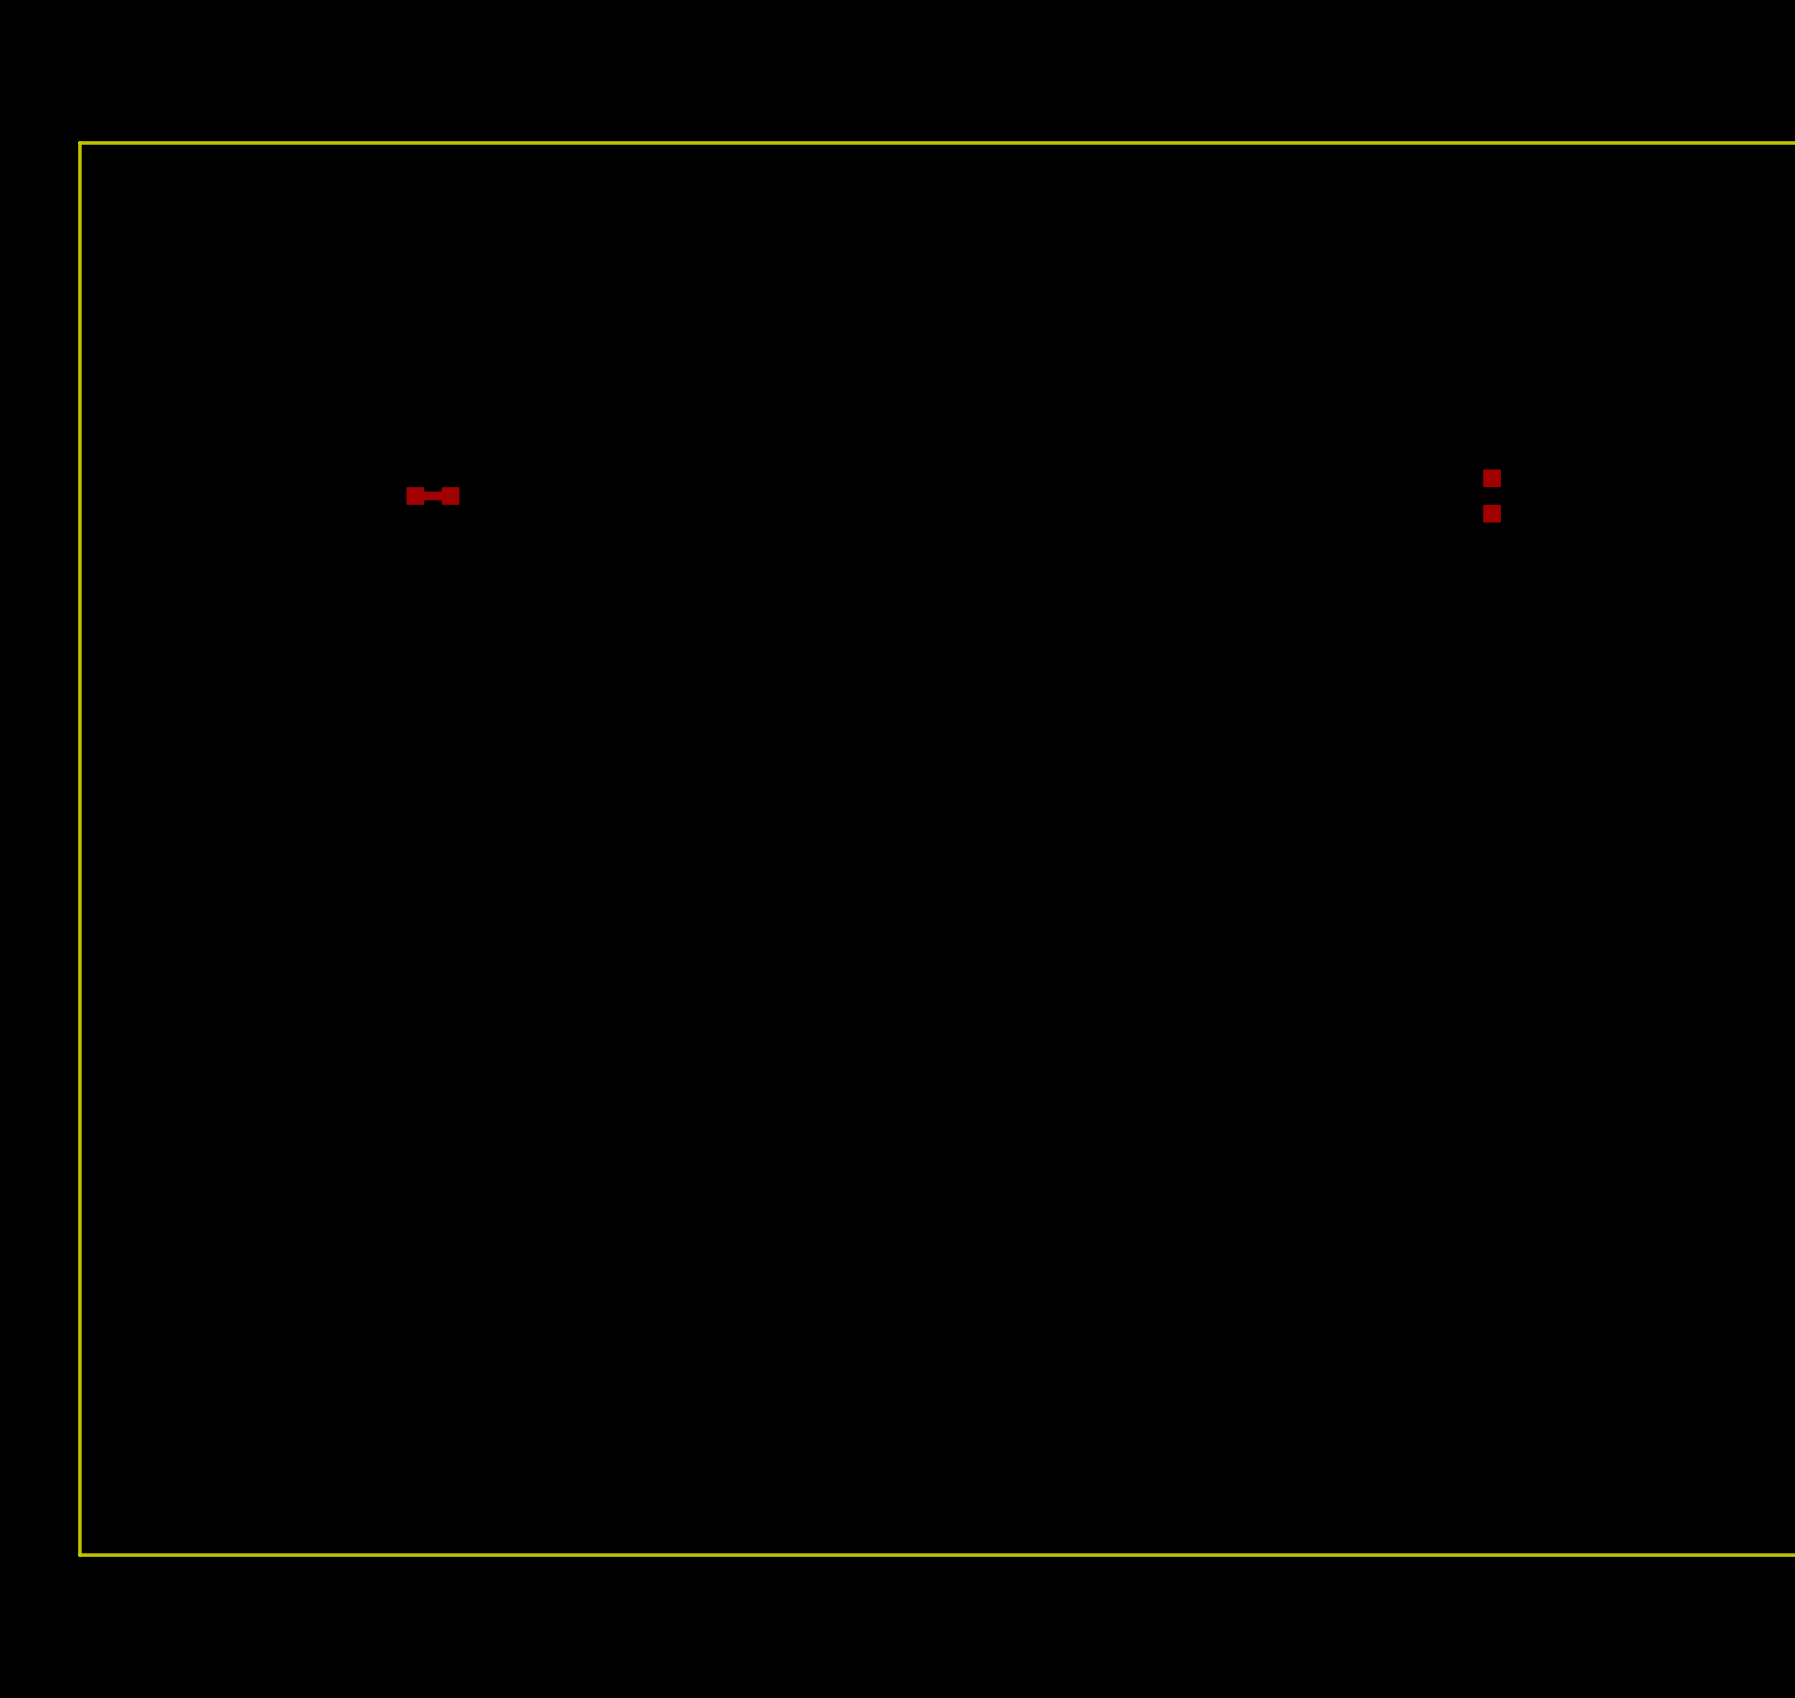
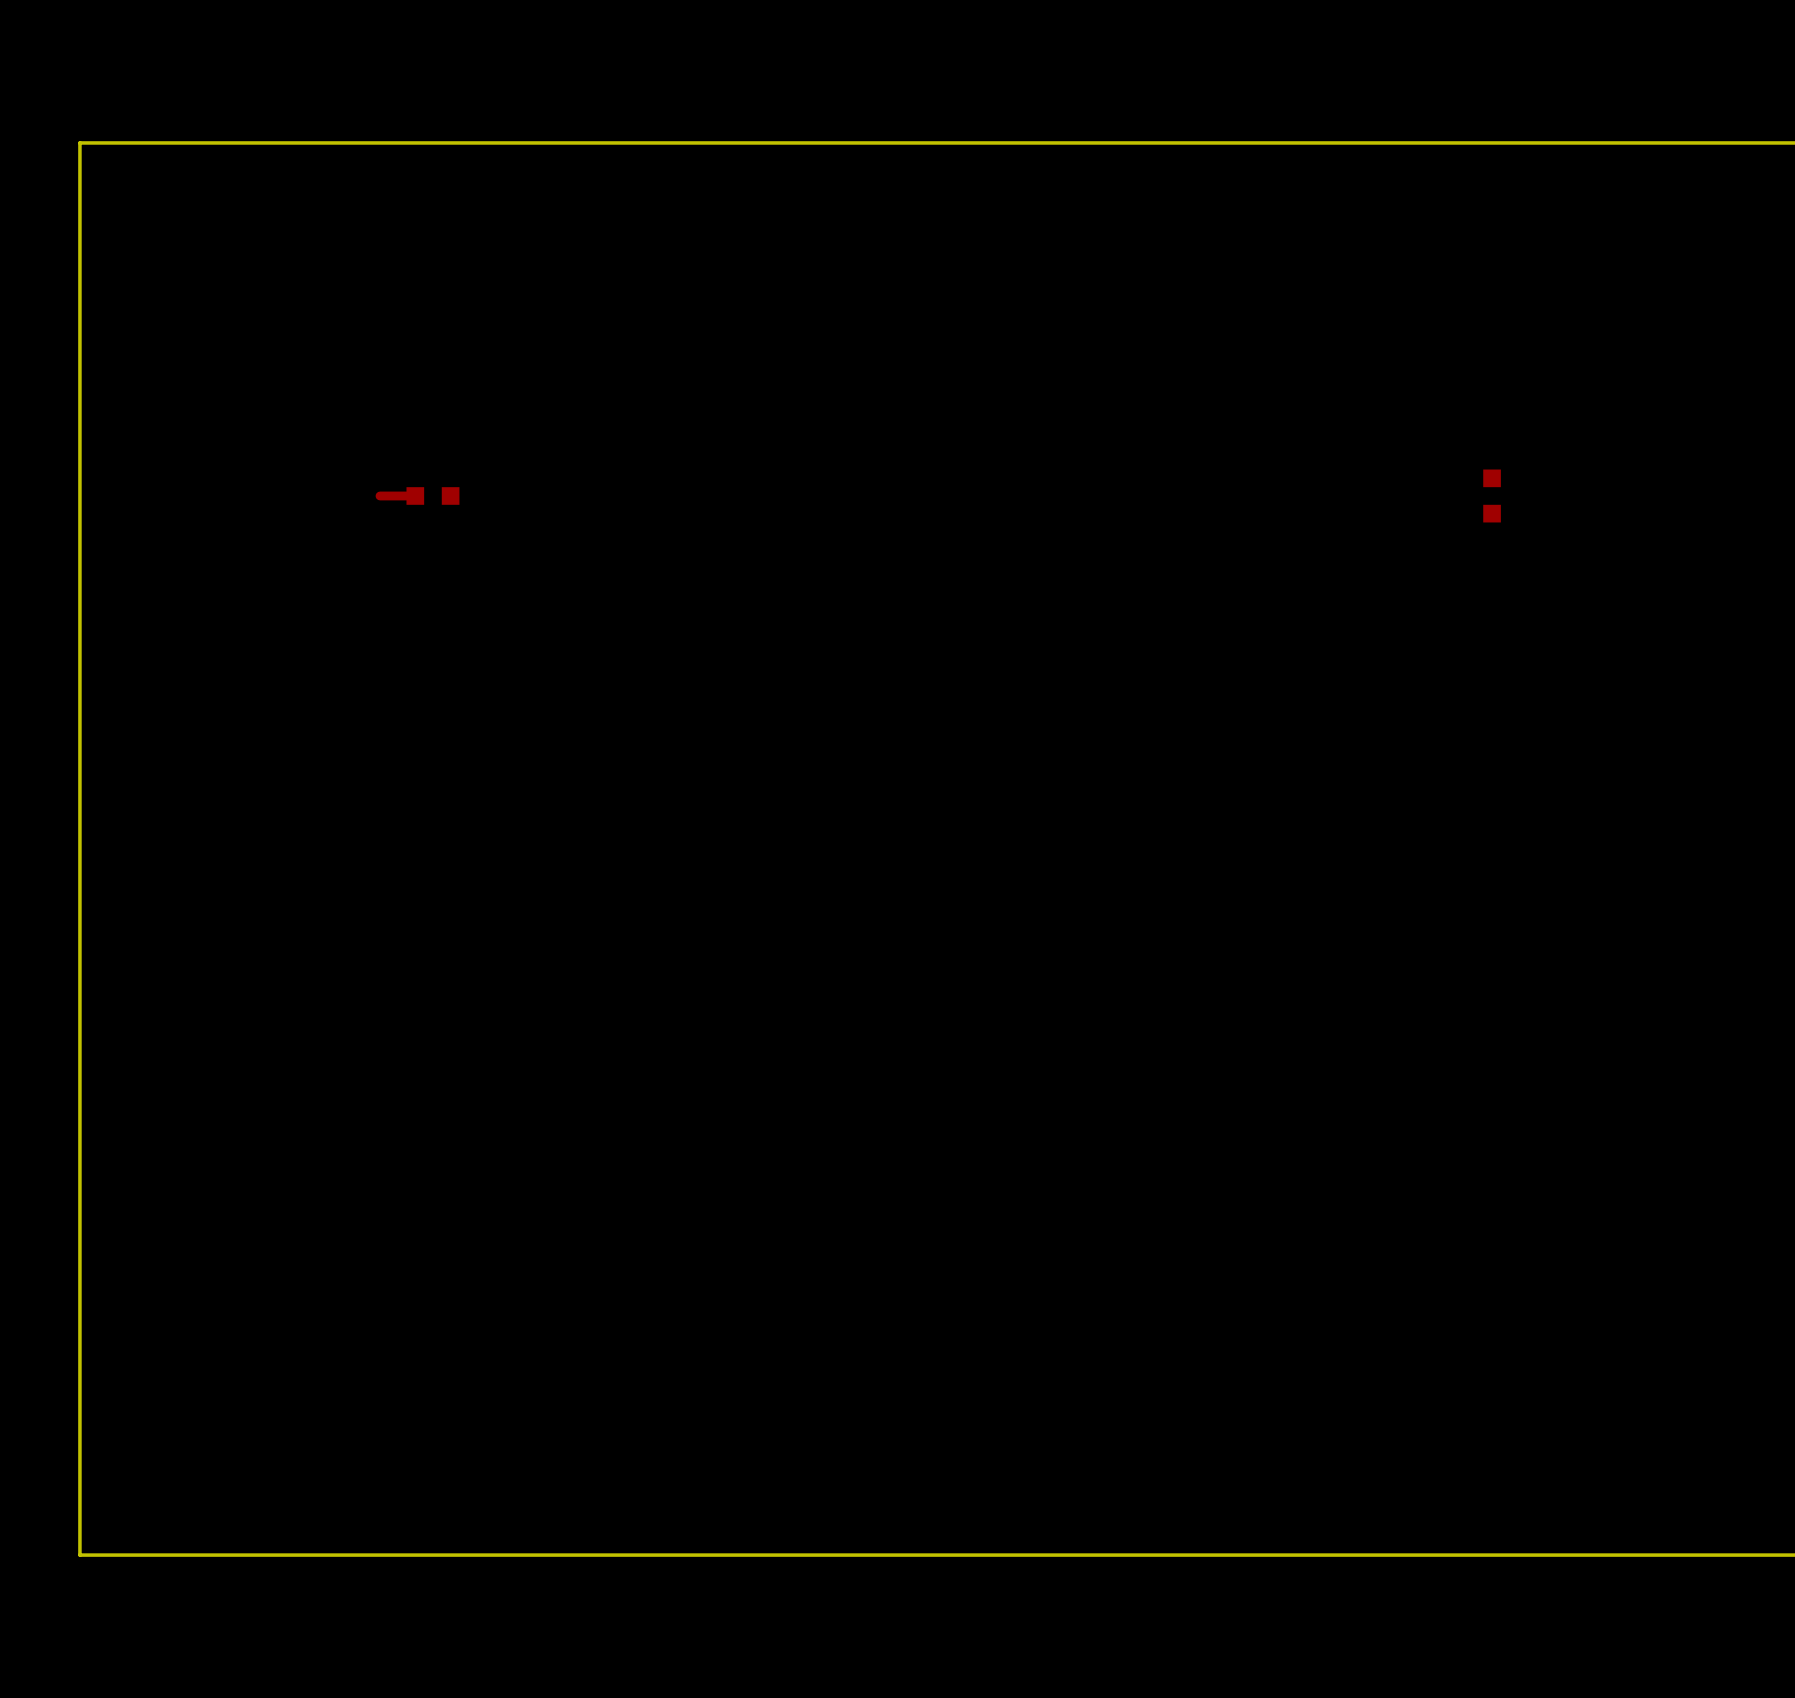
top track: (415, 495) (450, 495) -> (415, 495) (380, 495)

